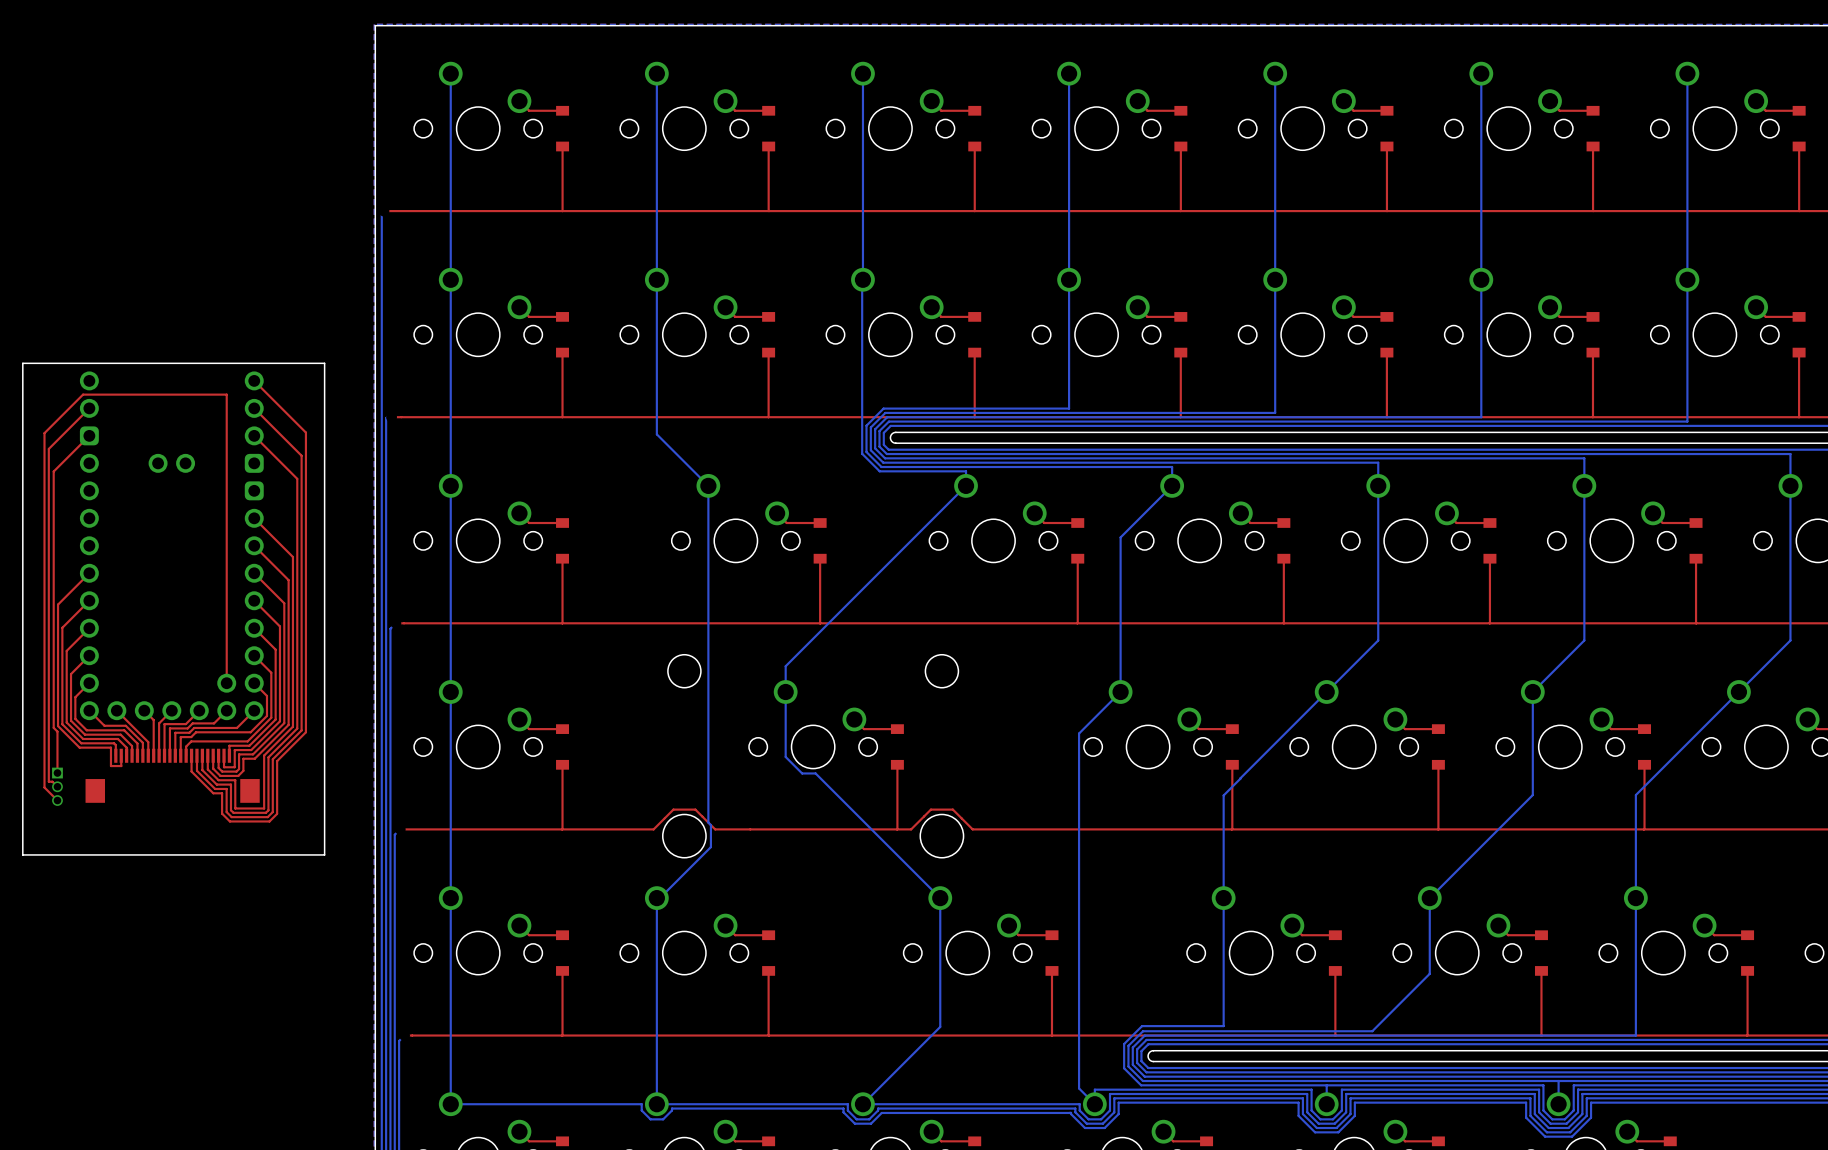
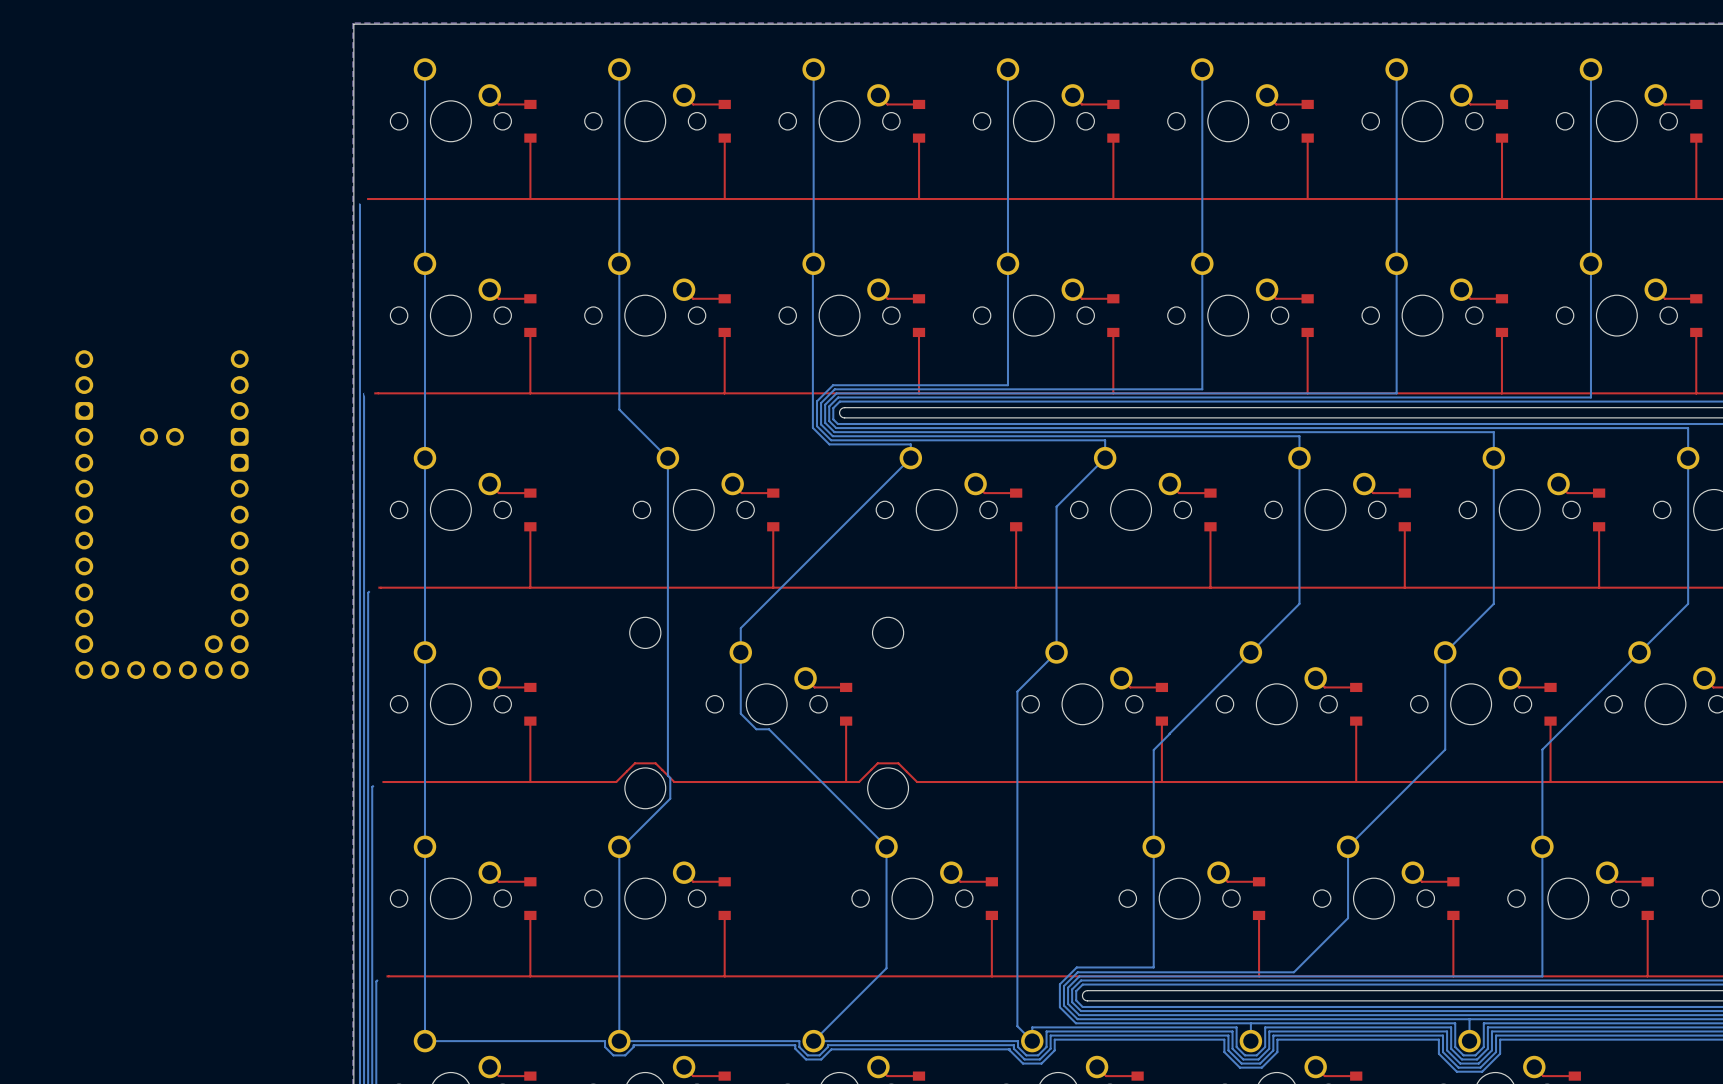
board edge: (324, 363) (22, 363) (22, 854) (324, 854) (324, 363) -> none
top track: (254, 380) (305, 432) (305, 732) (277, 761) (277, 813) (269, 821) (229, 821) (222, 813) (222, 793) (213, 793) (191, 771) (191, 755) -> none
top track: (89, 408) (48, 448) (48, 781) (52, 781) (57, 786) -> none
top track: (254, 408) (301, 455) (301, 730) (272, 759) (272, 812) (267, 817) (231, 817) (226, 812) (226, 788) (215, 788) (196, 770) (196, 755) -> none
top track: (89, 435) (53, 471) (53, 727) (57, 731) (57, 773) -> none
top track: (254, 435) (297, 478) (297, 728) (268, 757) (268, 810) (265, 812) (233, 812) (230, 810) (230, 784) (216, 784) (202, 770) (202, 755) -> none
top track: (254, 518) (292, 557) (292, 726) (264, 755) (264, 808) (235, 808) (235, 780) (218, 780) (207, 769) (207, 755) -> none
top track: (254, 545) (288, 580) (288, 724) (254, 758) (243, 758) (243, 770) (238, 775) (220, 775) (213, 768) (213, 755) -> none
top track: (89, 573) (58, 604) (58, 726) (79, 747) (110, 747) (110, 766) (121, 766) (121, 755) -> none
top track: (254, 573) (284, 603) (284, 723) (253, 754) (239, 754) (239, 769) (236, 771) (222, 771) (218, 767) (218, 755) -> none
top track: (89, 600) (62, 627) (62, 724) (81, 743) (114, 743) (115, 755) -> none
top track: (254, 600) (279, 626) (279, 721) (251, 750) (234, 750) (234, 767) (224, 767) (224, 755) -> none
top track: (89, 628) (66, 650) (66, 722) (83, 738) (117, 738) (126, 747) (126, 755) -> none
top track: (254, 628) (275, 649) (275, 719) (249, 745) (229, 745) (229, 755) -> none
top track: (89, 655) (71, 674) (71, 720) (84, 734) (120, 734) (132, 746) (132, 755) -> none
top track: (254, 655) (271, 672) (271, 717) (247, 741) (191, 741) (186, 746) (186, 755) -> none
top track: (89, 683) (75, 697) (75, 718) (86, 730) (124, 730) (137, 743) (137, 755) -> none
top track: (226, 683) (226, 394) (83, 394) (44, 433) (44, 787) (57, 800) -> none
top track: (254, 683) (266, 695) (266, 715) (250, 732) (196, 732) (191, 737) (180, 737) (180, 755) -> none
top track: (89, 710) (104, 725) (125, 725) (142, 742) (142, 755) -> none
top track: (116, 710) (148, 742) (148, 755) -> none
top track: (144, 710) (153, 720) (153, 755) -> none
top track: (171, 710) (159, 723) (159, 755) -> none
top track: (199, 710) (185, 724) (164, 724) (164, 755) -> none
top track: (226, 710) (214, 723) (192, 723) (187, 728) (169, 728) (169, 755) -> none
top track: (254, 710) (236, 727) (194, 727) (189, 732) (175, 732) (175, 755) -> none
part: (172, 775) -> none
part: (57, 786) -> none

